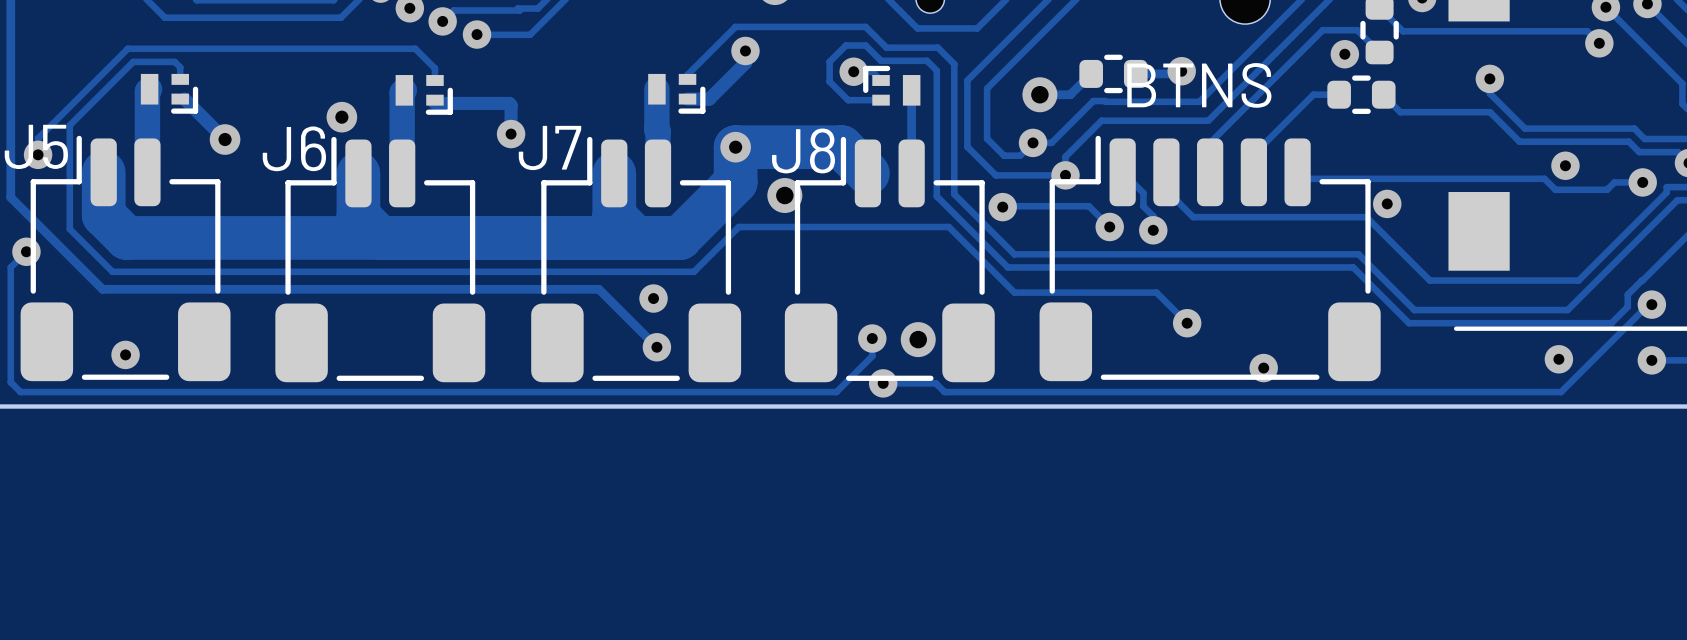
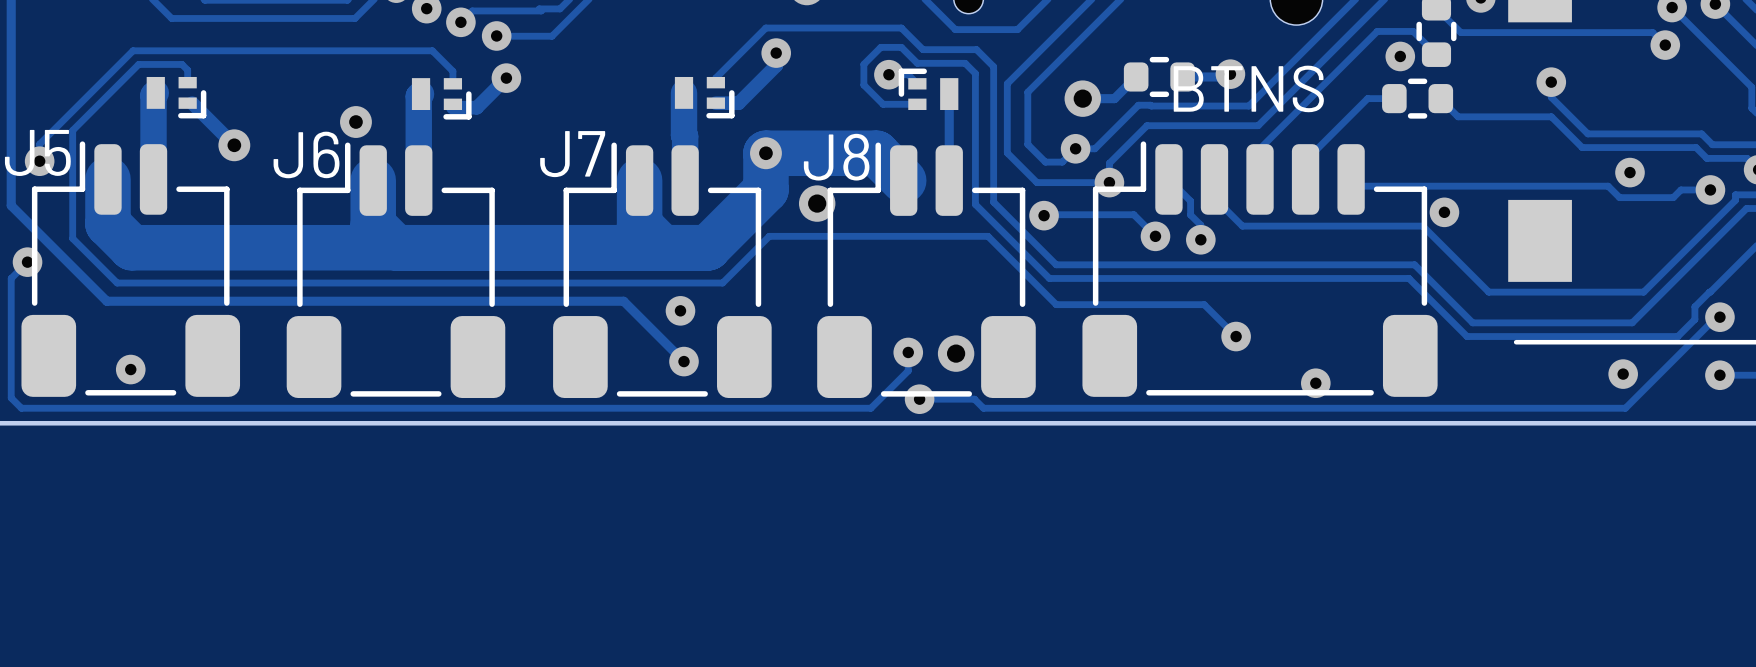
track: (457, 103) (509, 103) (511, 105) (511, 134) -> (476, 107) (506, 78)
via position: (511, 134) -> (506, 78)

